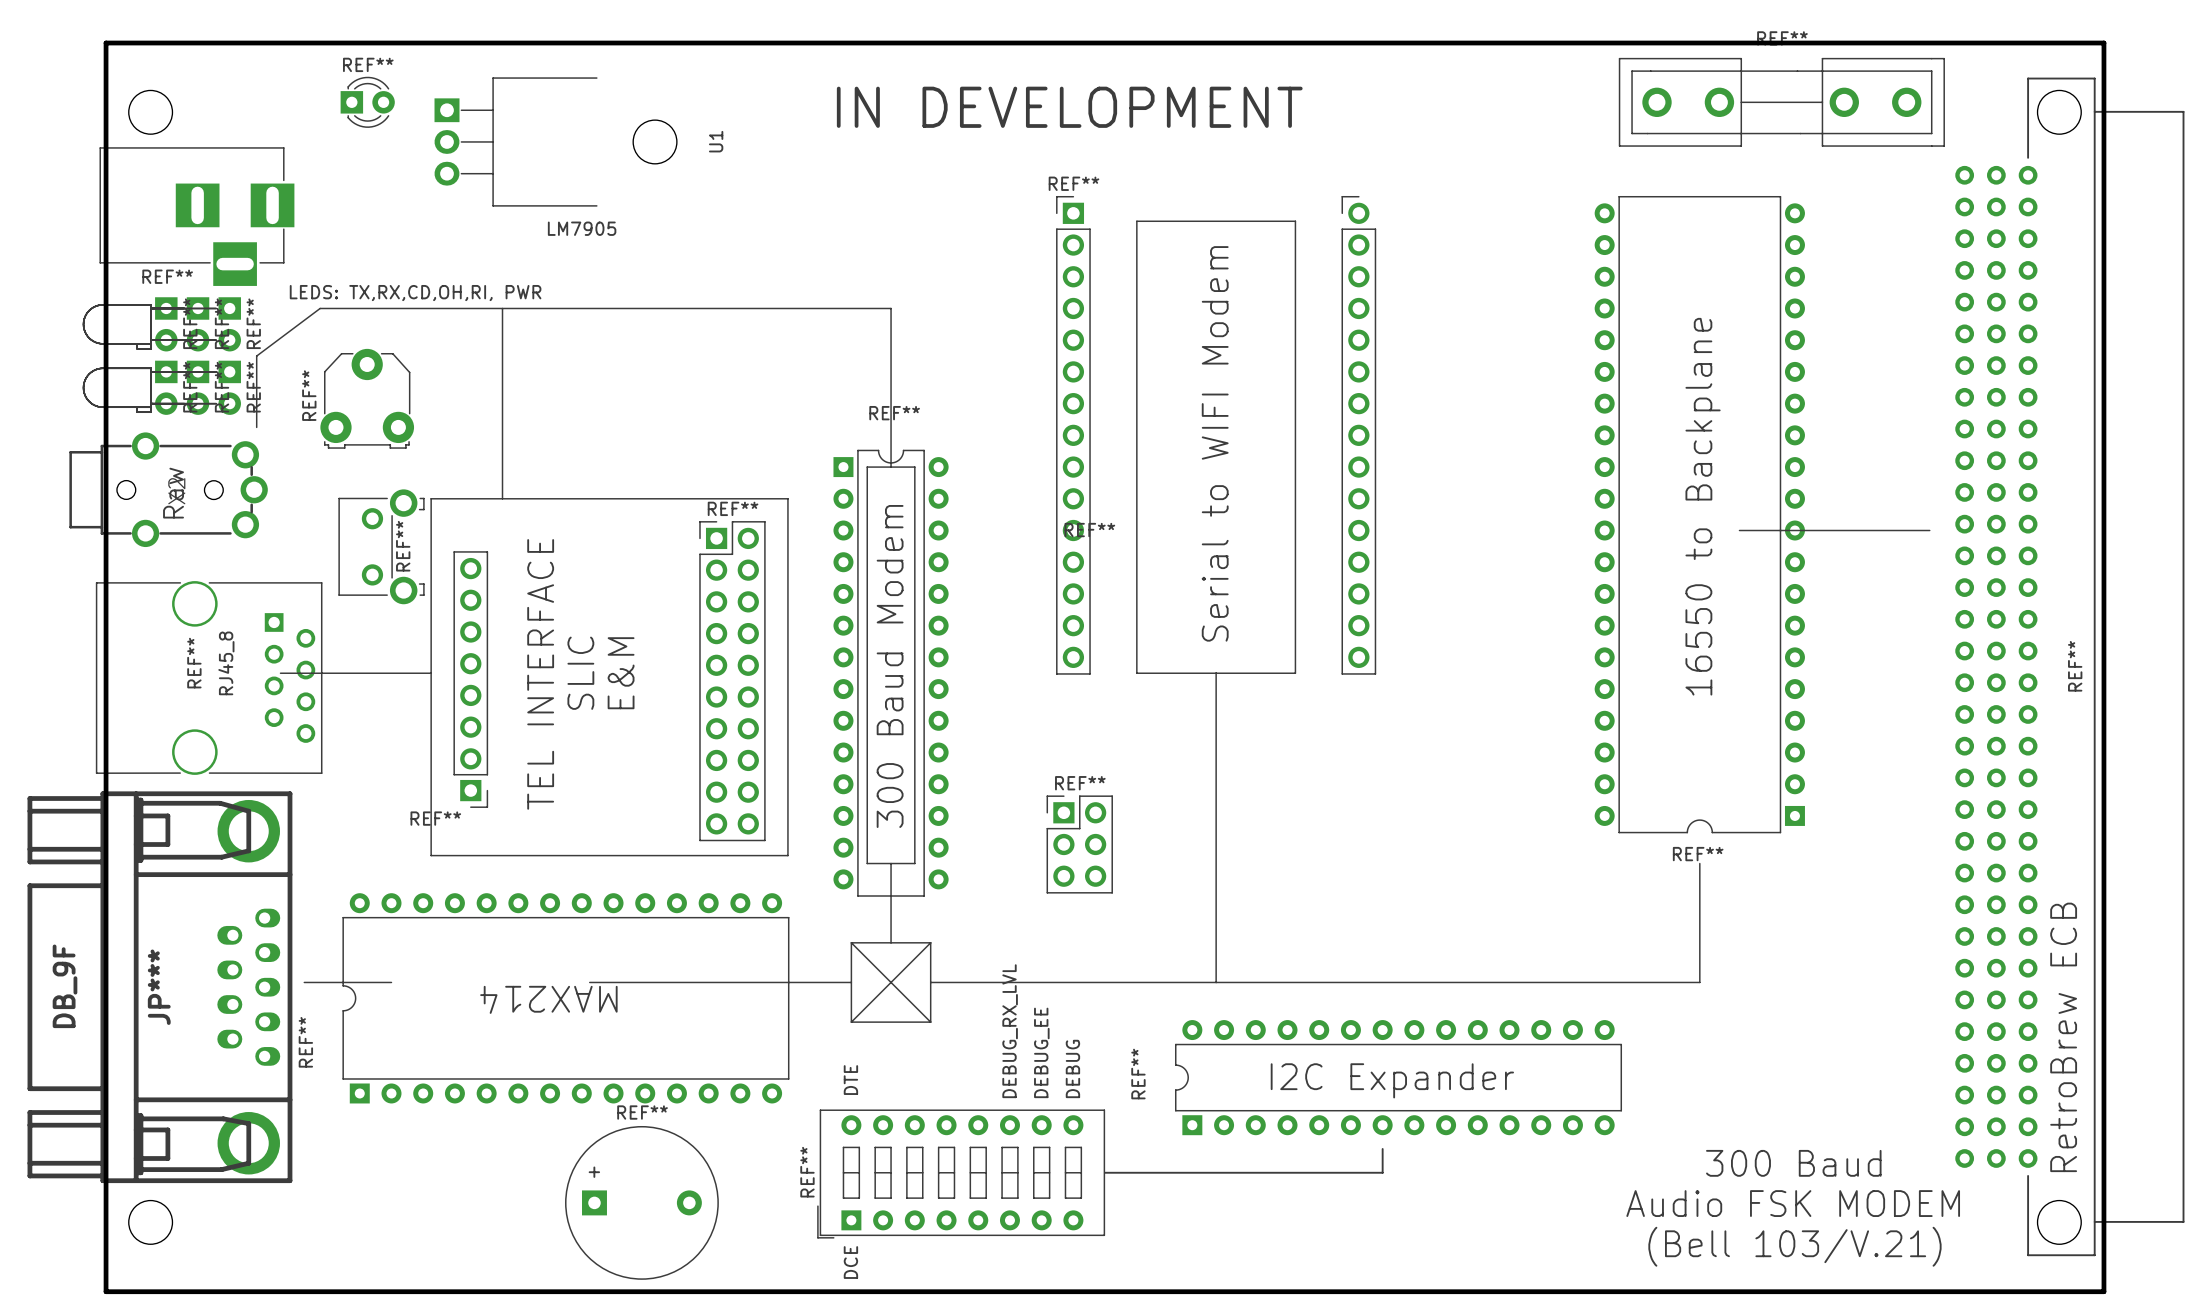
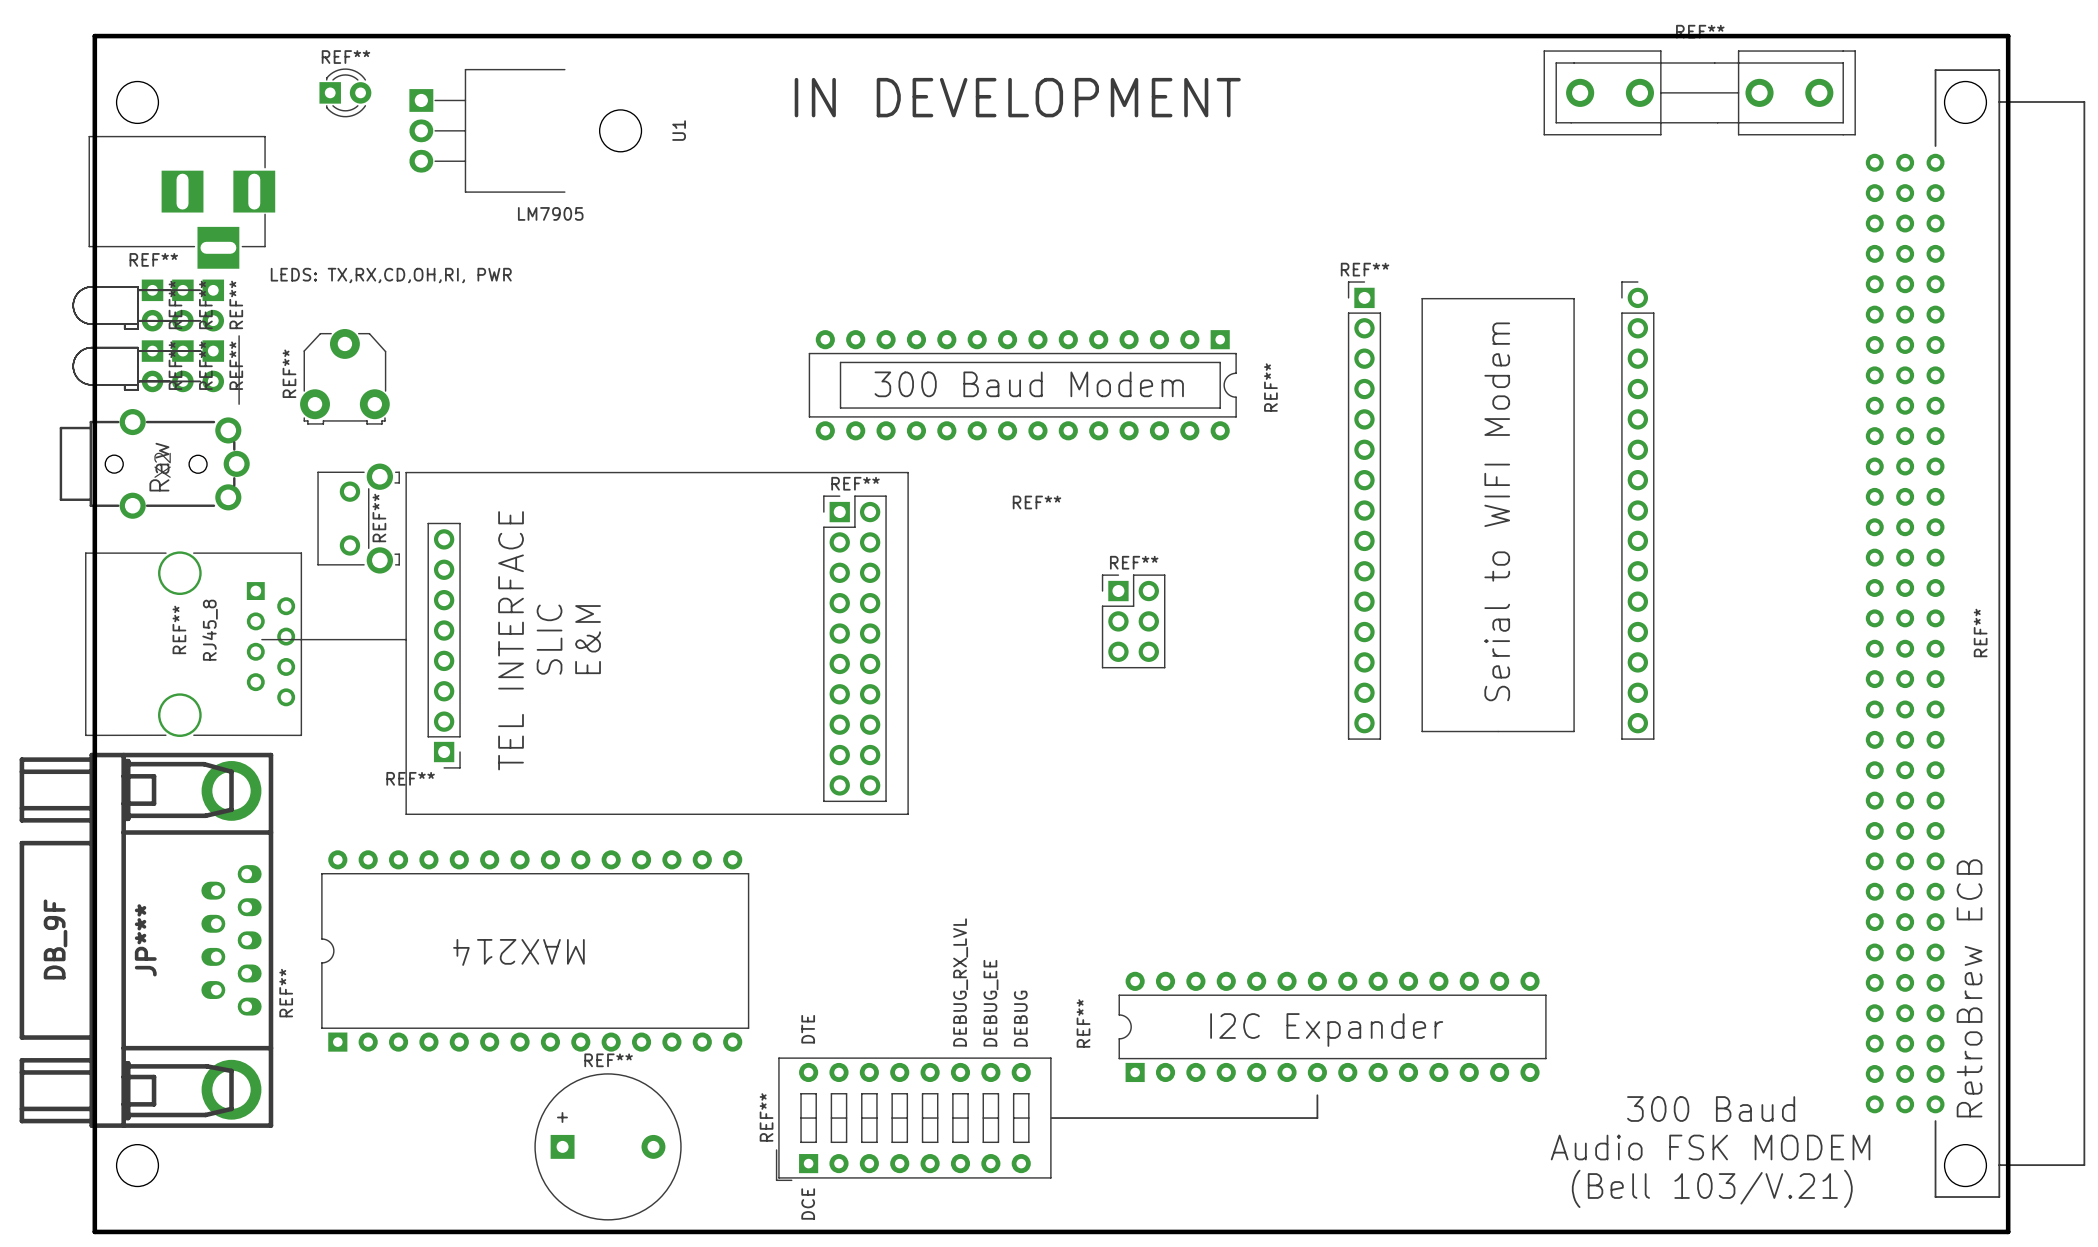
line: (1136, 221) (1295, 221) (1295, 673) (1136, 673) (1136, 221) -> none
line: (502, 308) (502, 498) -> none
line: none -> (1422, 298) (1574, 298) (1574, 731) (1422, 731) (1422, 298)
line: (256, 356) (320, 308) (891, 308) (891, 467) -> none
line: none -> (840, 362) (1220, 362) (1220, 408) (840, 408) (840, 362)
text: none -> 300 Baud Modem (1029, 384)
REF**: none -> (1022, 385)
REF**: (1216, 435) -> none
text: Serial to WIFI Modem (1215, 443) -> none
line: (867, 467) (867, 863) (914, 863) (914, 467) (867, 467) -> none
line: (787, 498) (787, 855) -> (747, 472) (908, 472) (908, 814) (747, 814)
text: 16550 to Backplane (1703, 506) -> none
REF**: (1699, 514) -> none
line: (1739, 530) (1929, 530) -> none
REF**: none -> (1501, 510)
text: none -> Serial to WIFI Modem (1497, 511)
text: 300 Baud Modem (890, 666) -> none
REF**: (891, 673) -> none
line: (1216, 673) (1216, 982) -> none
REF** position: (732, 681) -> (854, 648)
REF** position: (1079, 844) -> (1133, 621)
line: (891, 863) (891, 942) -> none
line: (1699, 863) (1699, 982) (930, 982) -> none
line: (851, 942) (930, 1022) -> none
line: (851, 942) (851, 1022) -> none
line: (851, 942) (930, 942) -> none
line: (930, 942) (851, 1022) -> none
line: (930, 942) (930, 1022) -> none
line: (304, 982) (391, 982) -> none
line: (589, 982) (851, 982) -> none
line: (851, 1022) (930, 1022) -> none

